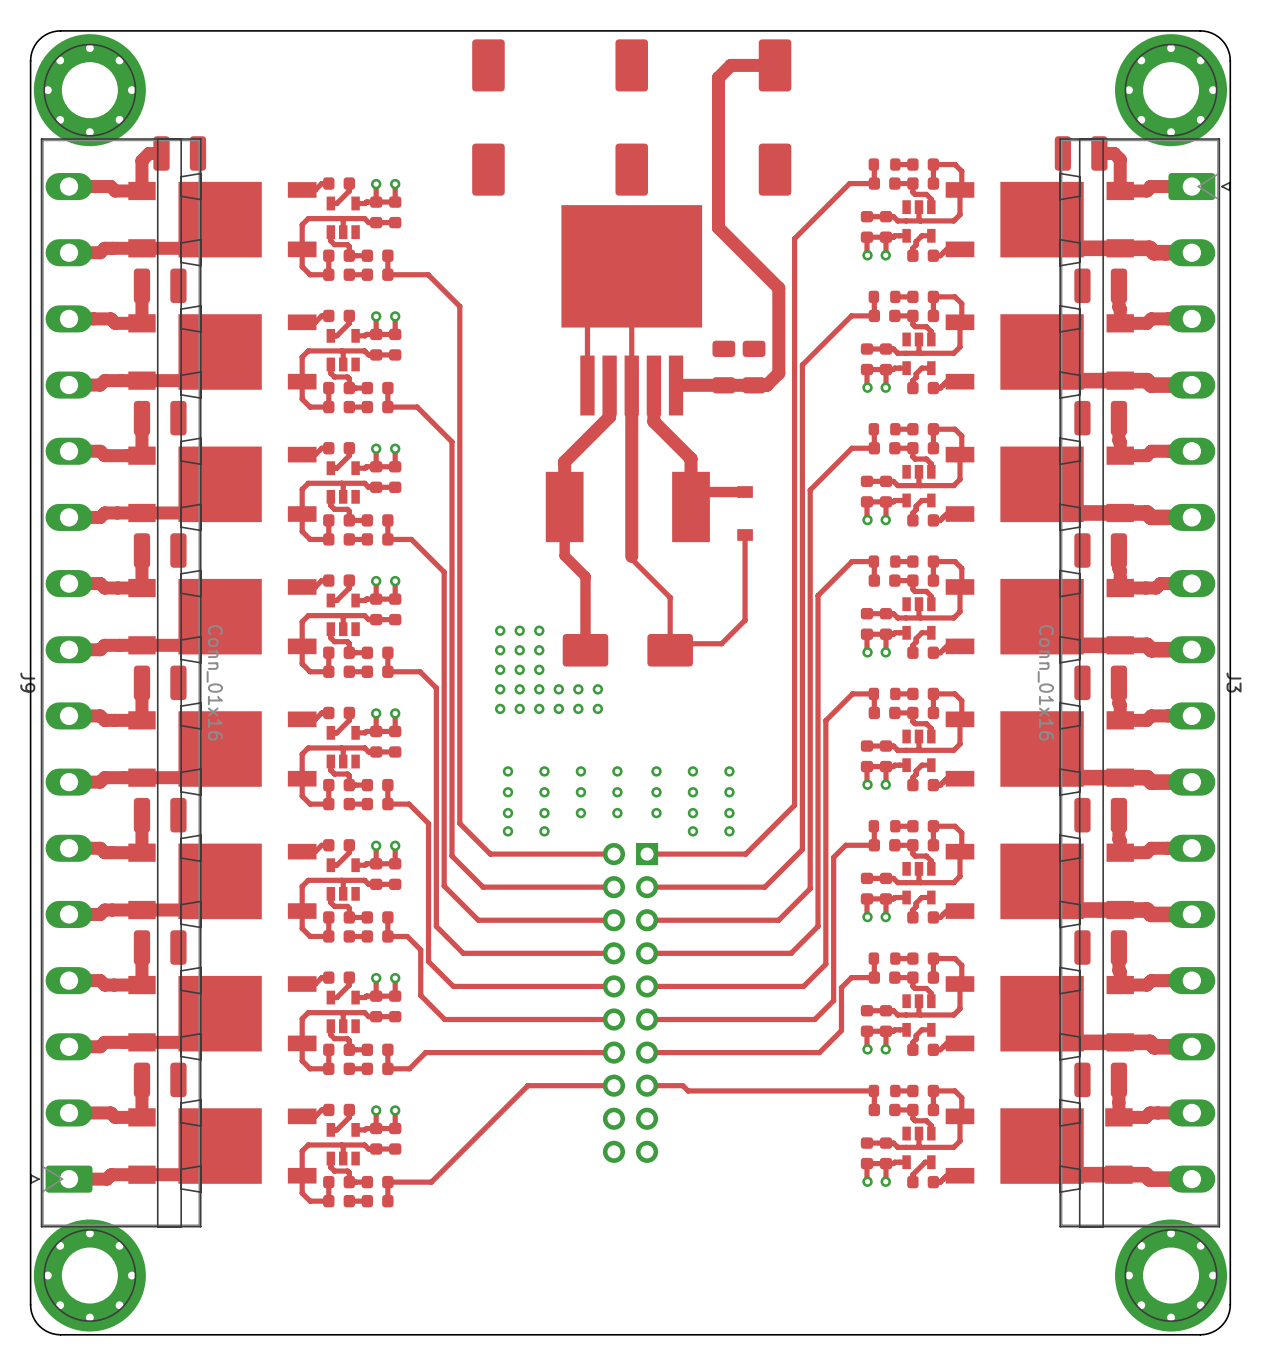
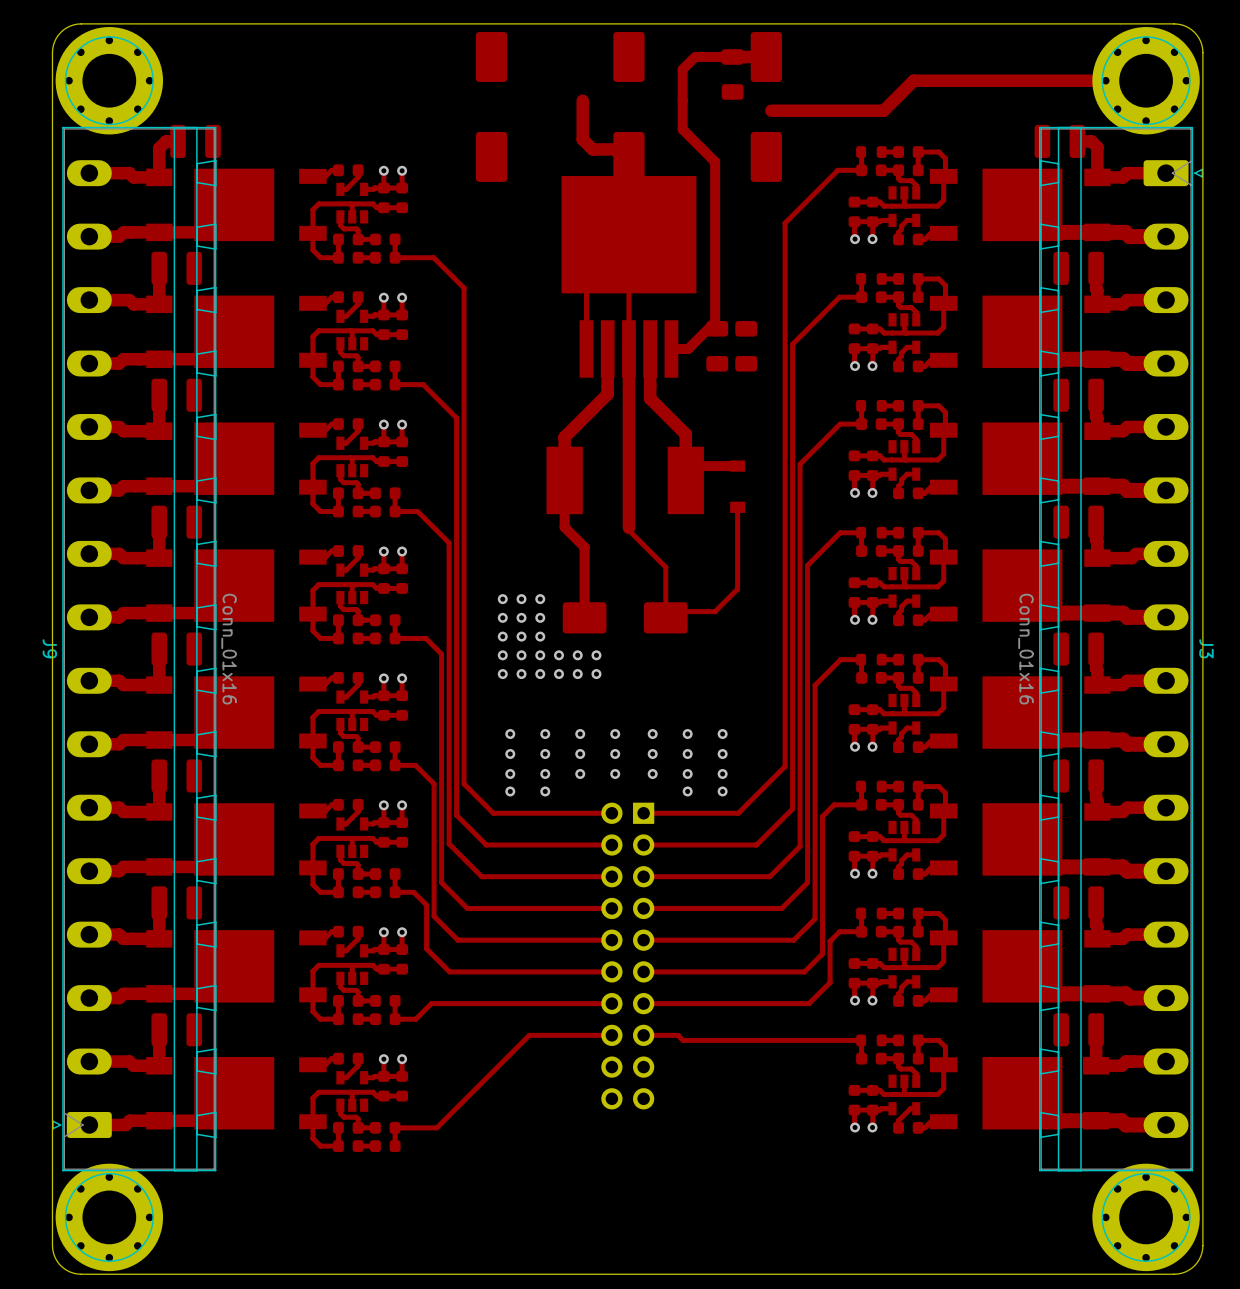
top track: (730, 65) (718, 77) (718, 227) (778, 288) (778, 373) (766, 385) (676, 385) -> (724, 57) (695, 57) (682, 69) (682, 129) (715, 161) (715, 322) (688, 348) (671, 348)
part: none -> (732, 74)
top track: none -> (1146, 80) (913, 80) (883, 110) (771, 110)
top track: none -> (582, 100) (582, 139) (592, 149) (614, 149) (628, 163) (628, 234)
part position: (631, 310) -> (628, 276)

